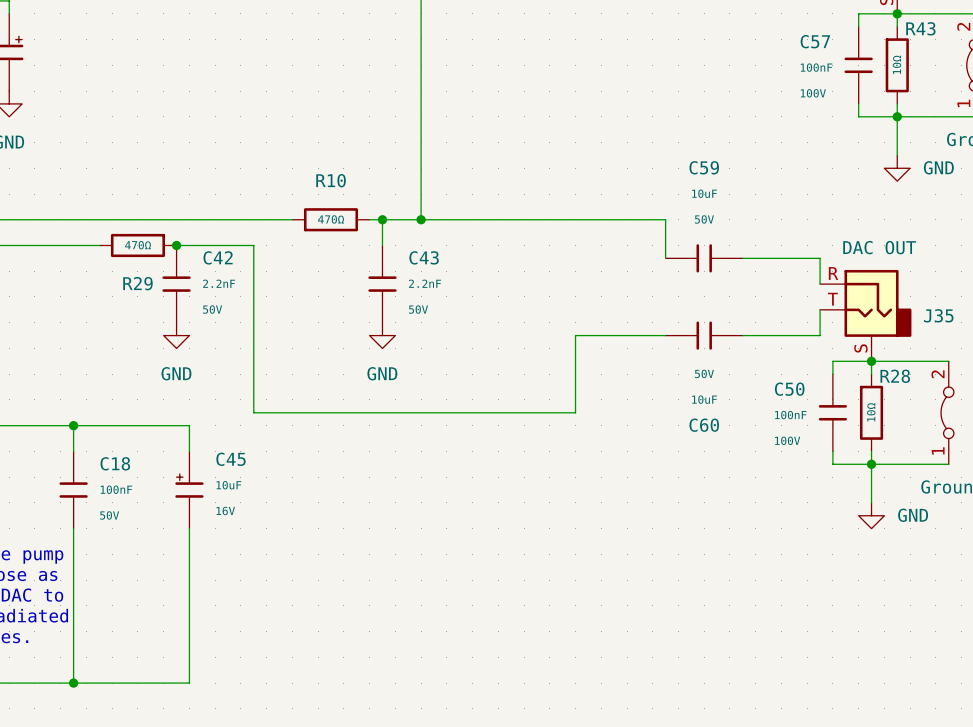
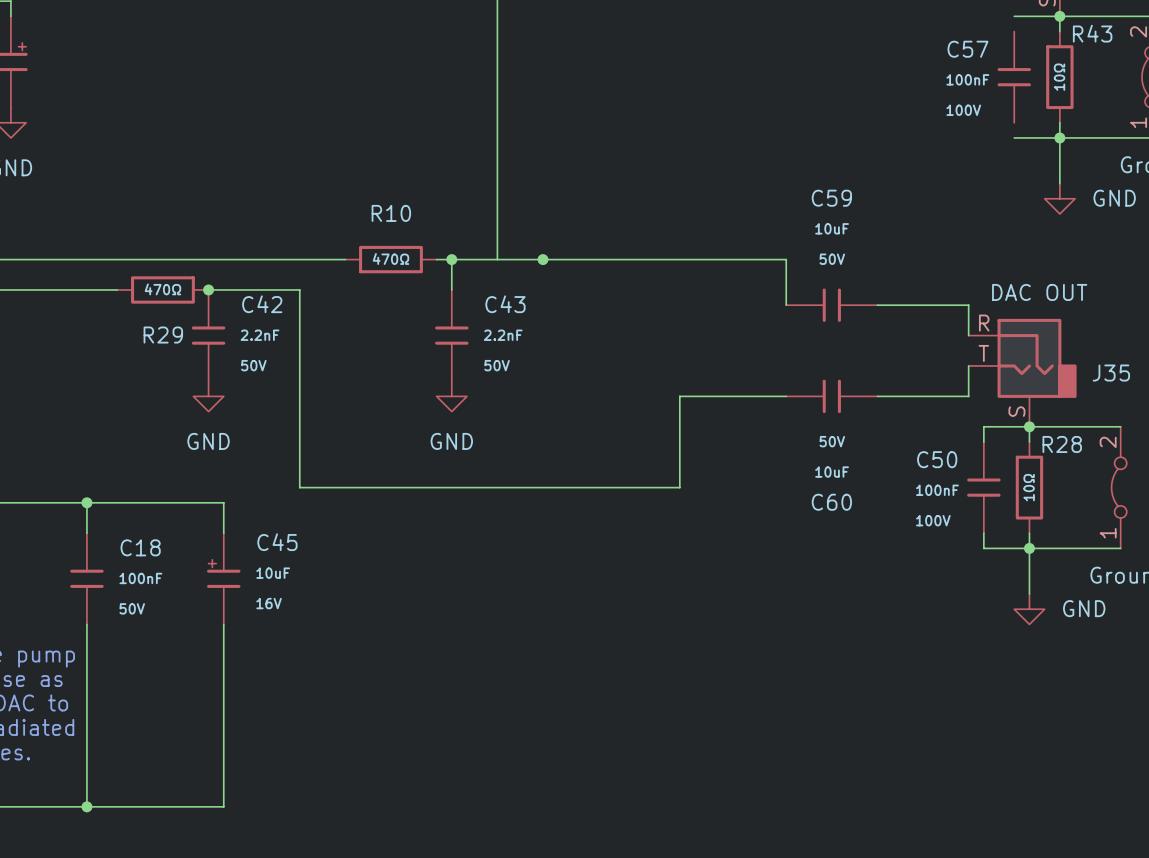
wire: (858, 13) (858, 26) -> none
wire: (858, 103) (858, 116) -> none
junction position: (421, 219) -> (543, 259)

